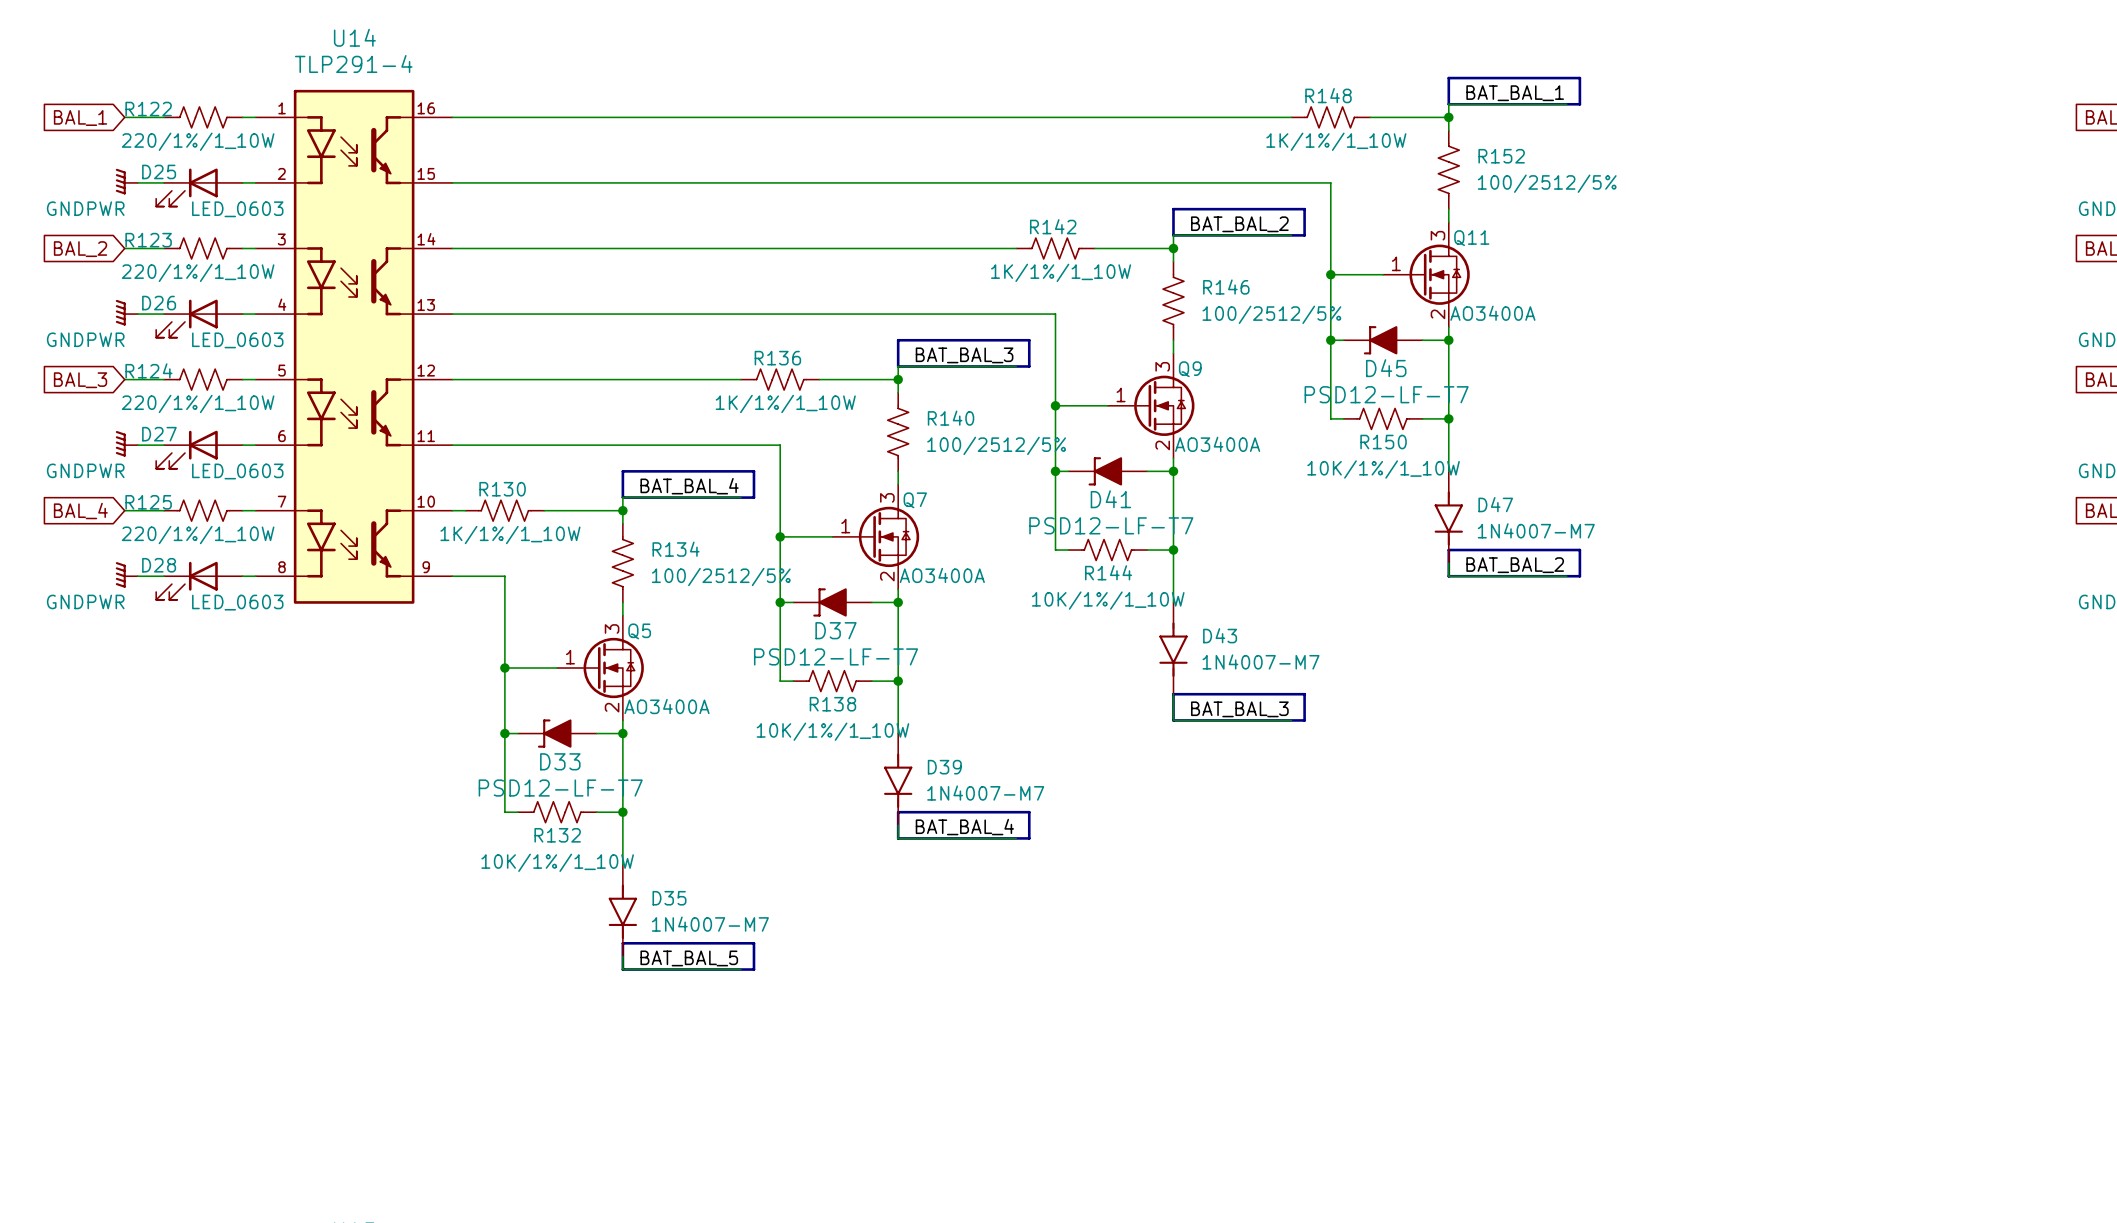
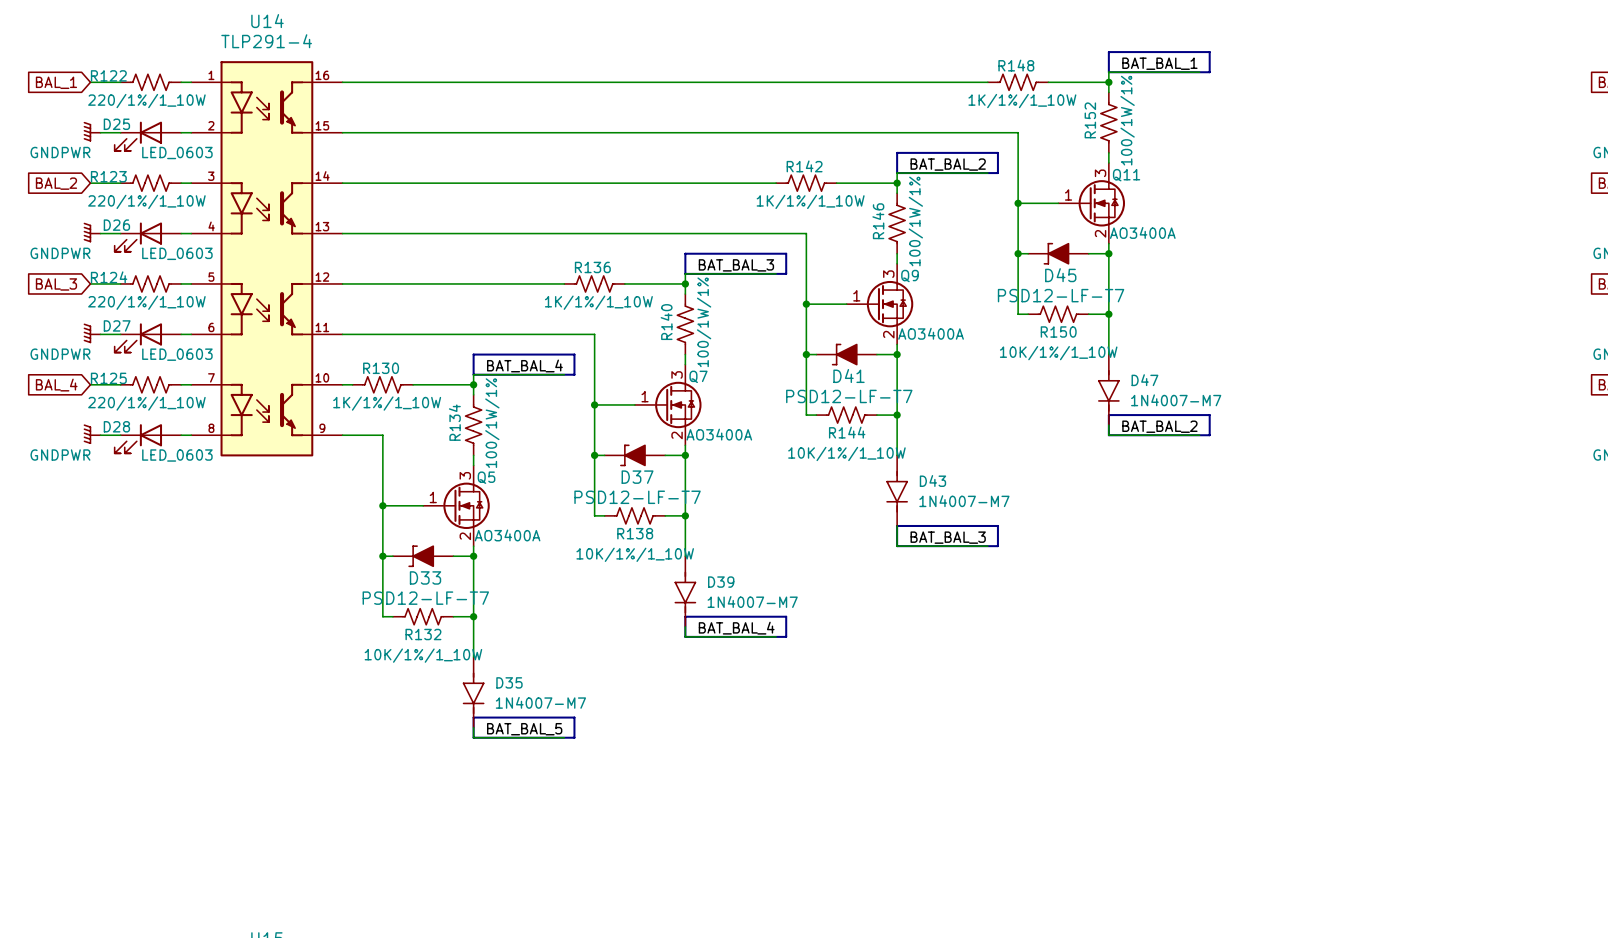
R152 name rotation: 0° (1501, 156) -> 90° counterclockwise (1090, 120)
R152 name position: R152 (1501, 156) -> R152 (1090, 120)
R152 value: 100/2512/5% (1547, 183) -> 100/1W/1% (1127, 120)
R146 name rotation: 0° (1226, 287) -> 90° counterclockwise (878, 221)
R146 name position: R146 (1226, 287) -> R146 (878, 221)
R146 value: 100/2512/5% (1271, 314) -> 100/1W/1% (915, 221)
R140 name rotation: 0° (951, 418) -> 90° counterclockwise (666, 322)
R140 name position: R140 (951, 418) -> R140 (666, 322)
R140 value: 100/2512/5% (996, 445) -> 100/1W/1% (704, 322)
R134 name rotation: 0° (676, 549) -> 90° counterclockwise (454, 422)
R134 name position: R134 (676, 549) -> R134 (454, 422)
R134 value: 100/2512/5% (721, 576) -> 100/1W/1% (492, 423)

